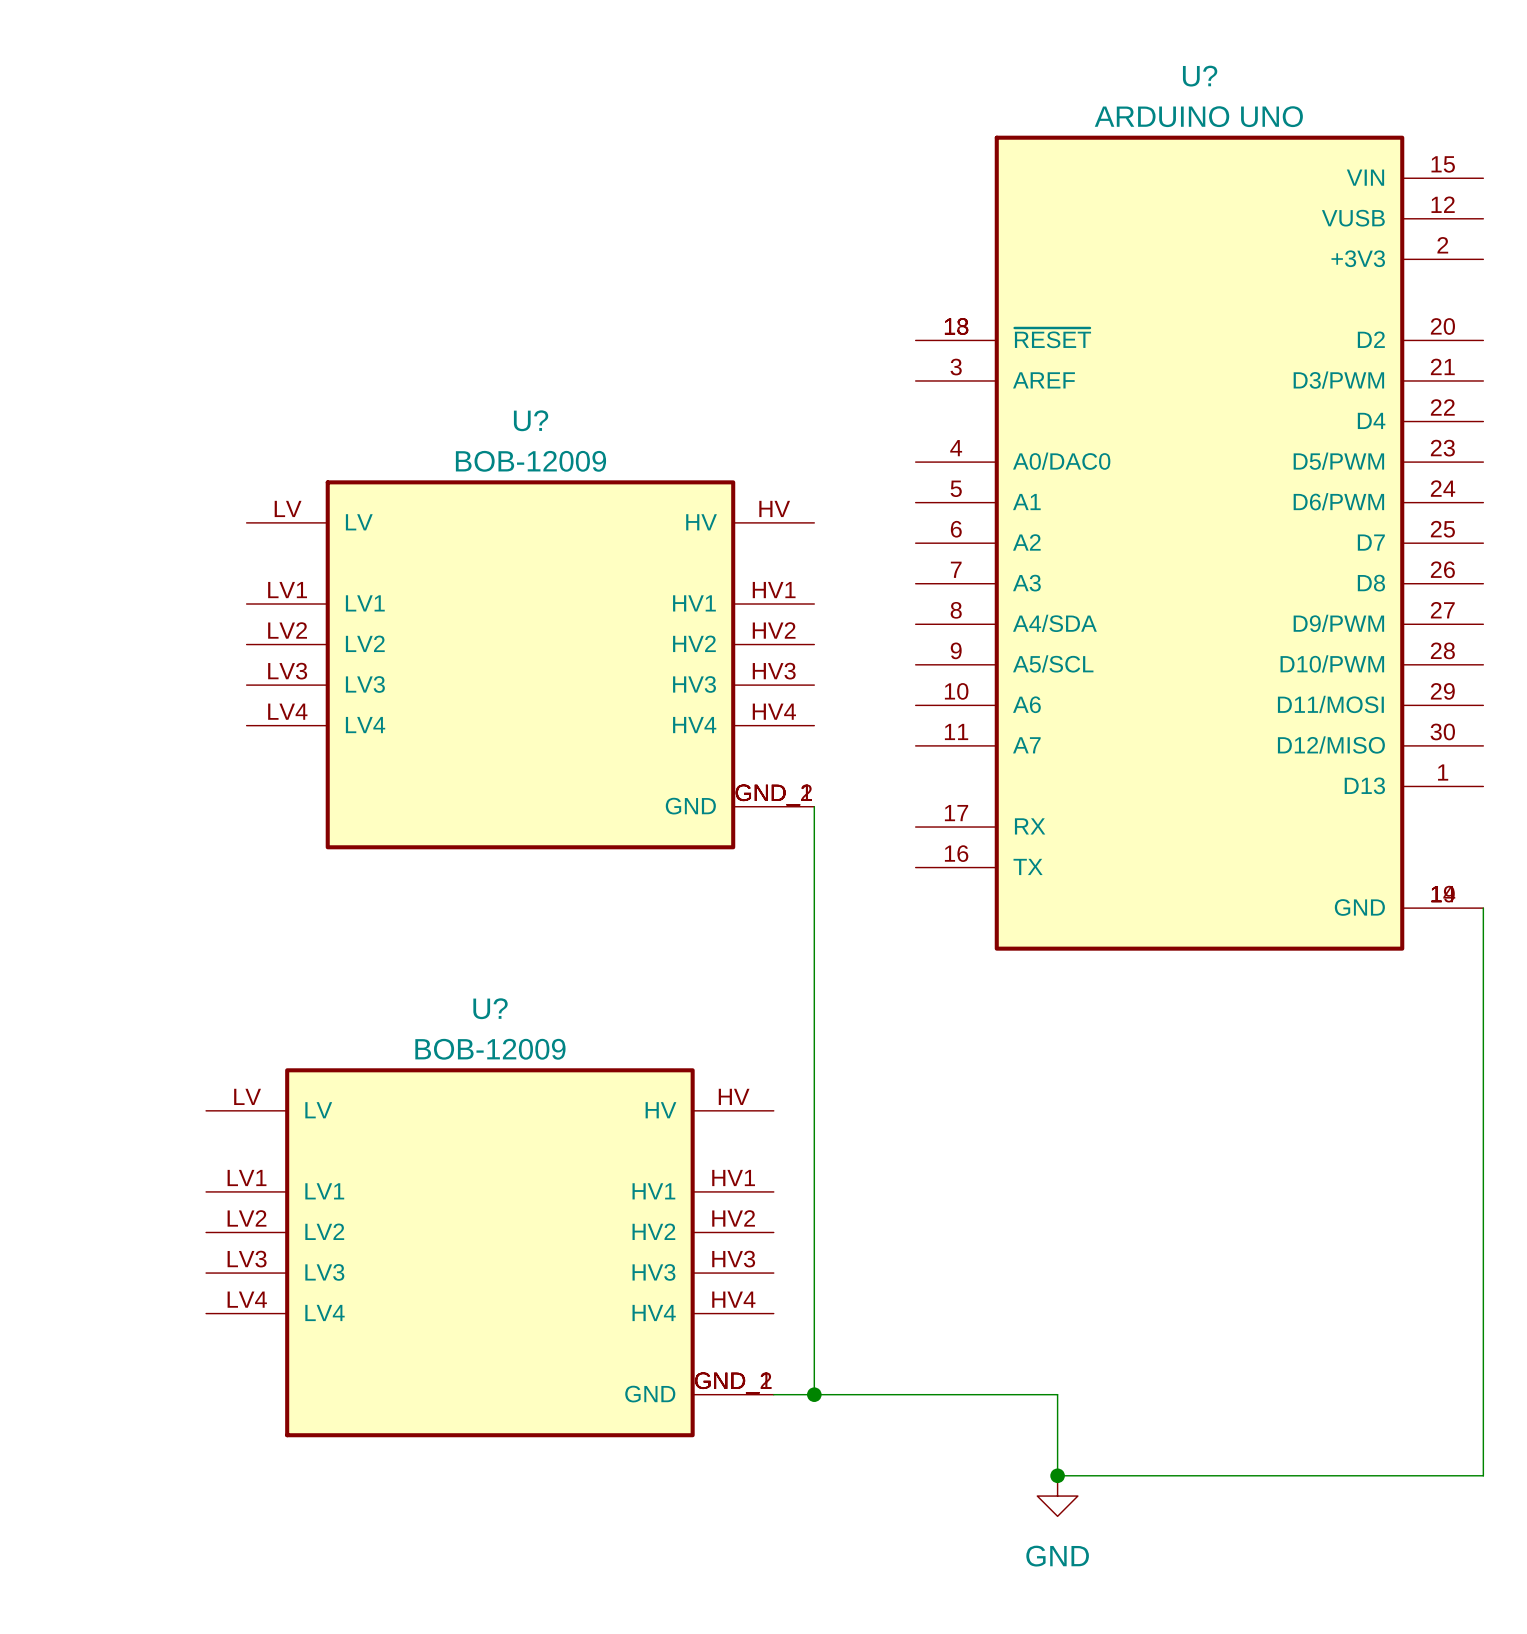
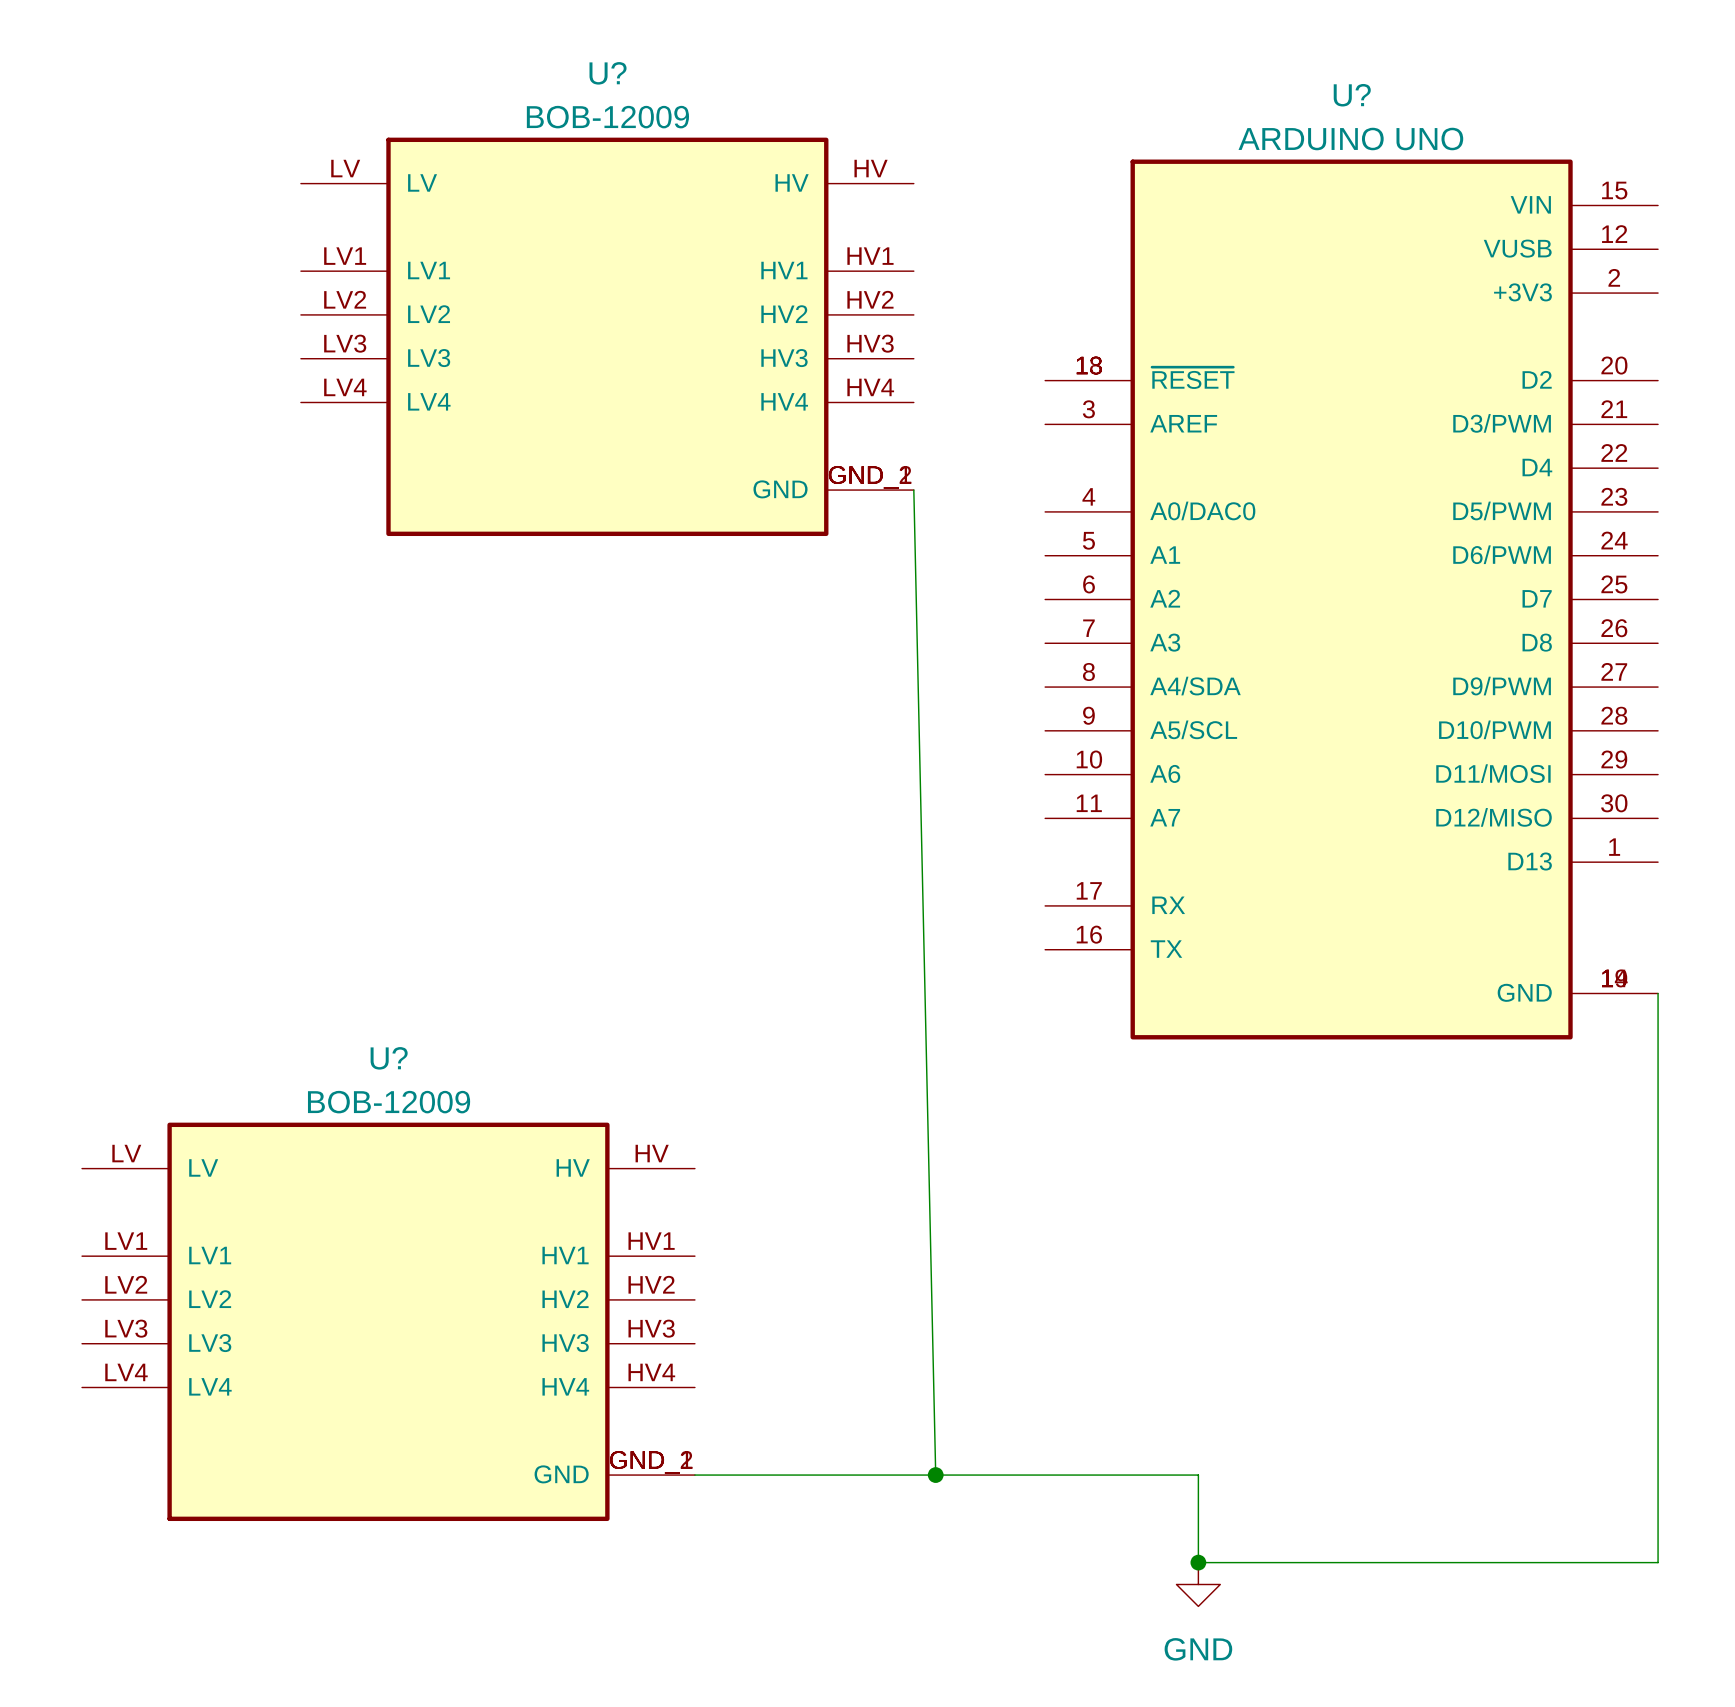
U?: none -> BOB-12009 (607, 336)
U? position: (1199, 543) -> (1351, 599)
U?: BOB-12009 (530, 664) -> none
wire: (814, 806) (814, 1394) -> (913, 490) (935, 1475)
wire: (1483, 908) (1483, 948) -> none
U? position: (489, 1252) -> (388, 1321)

